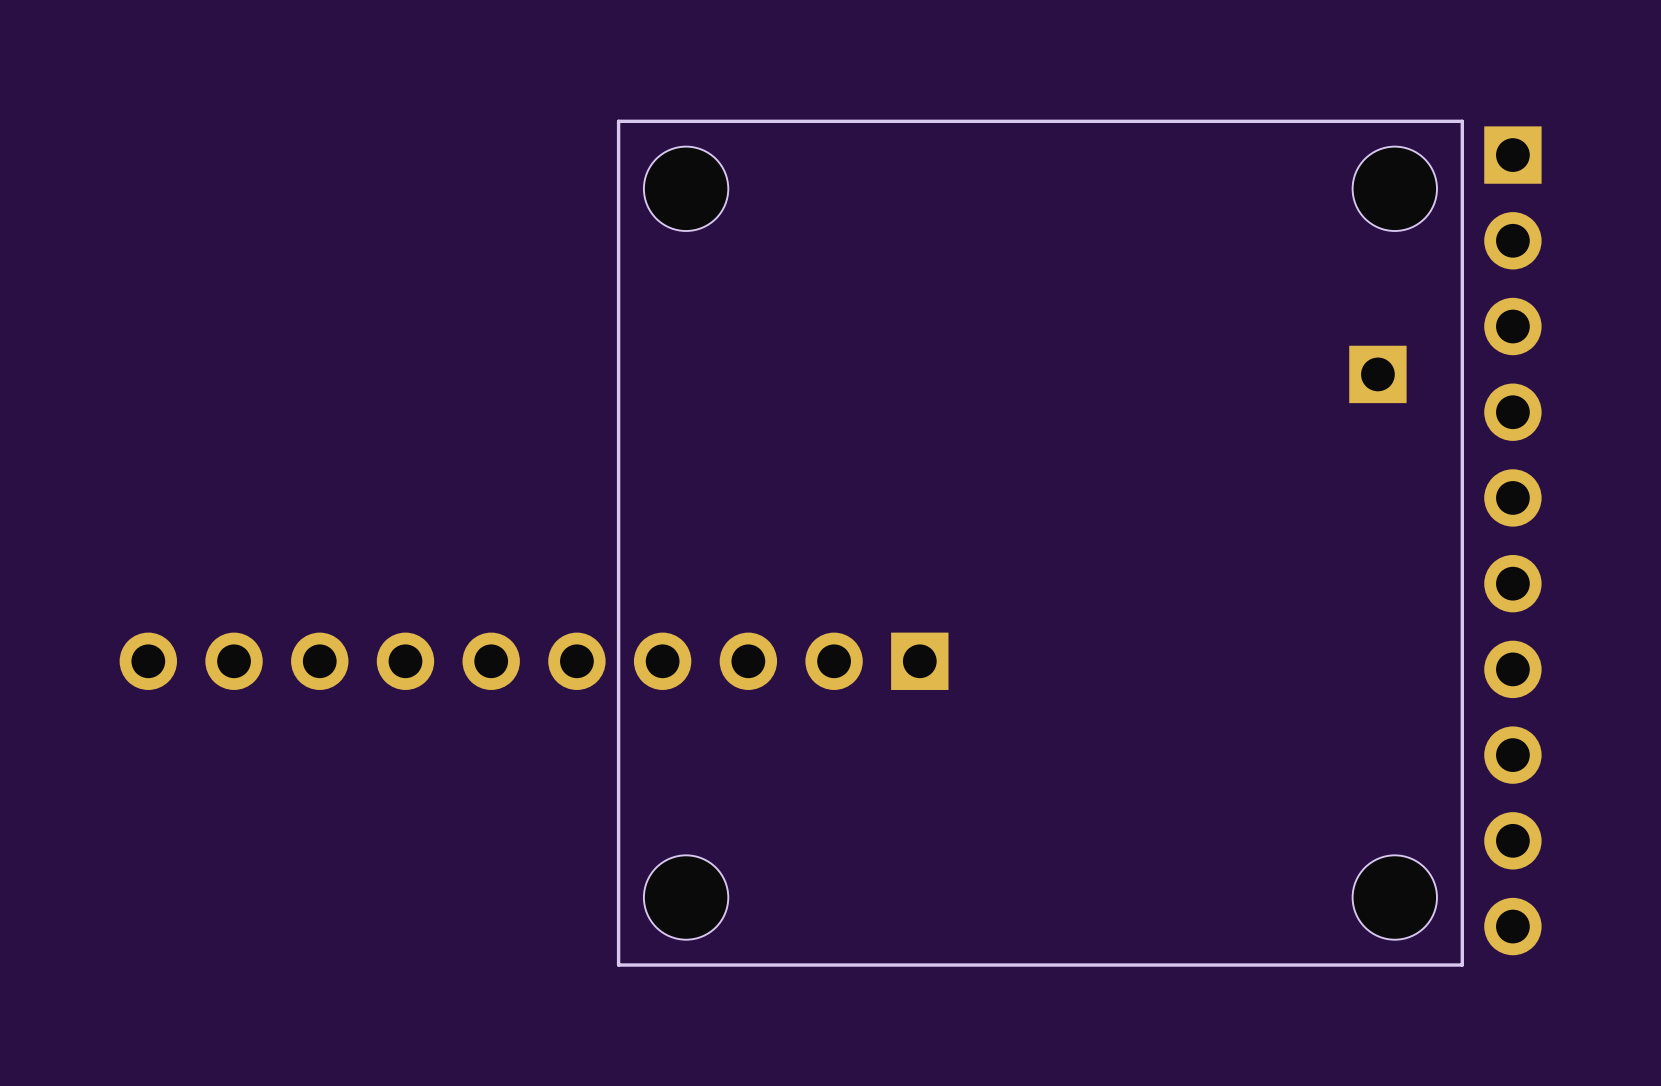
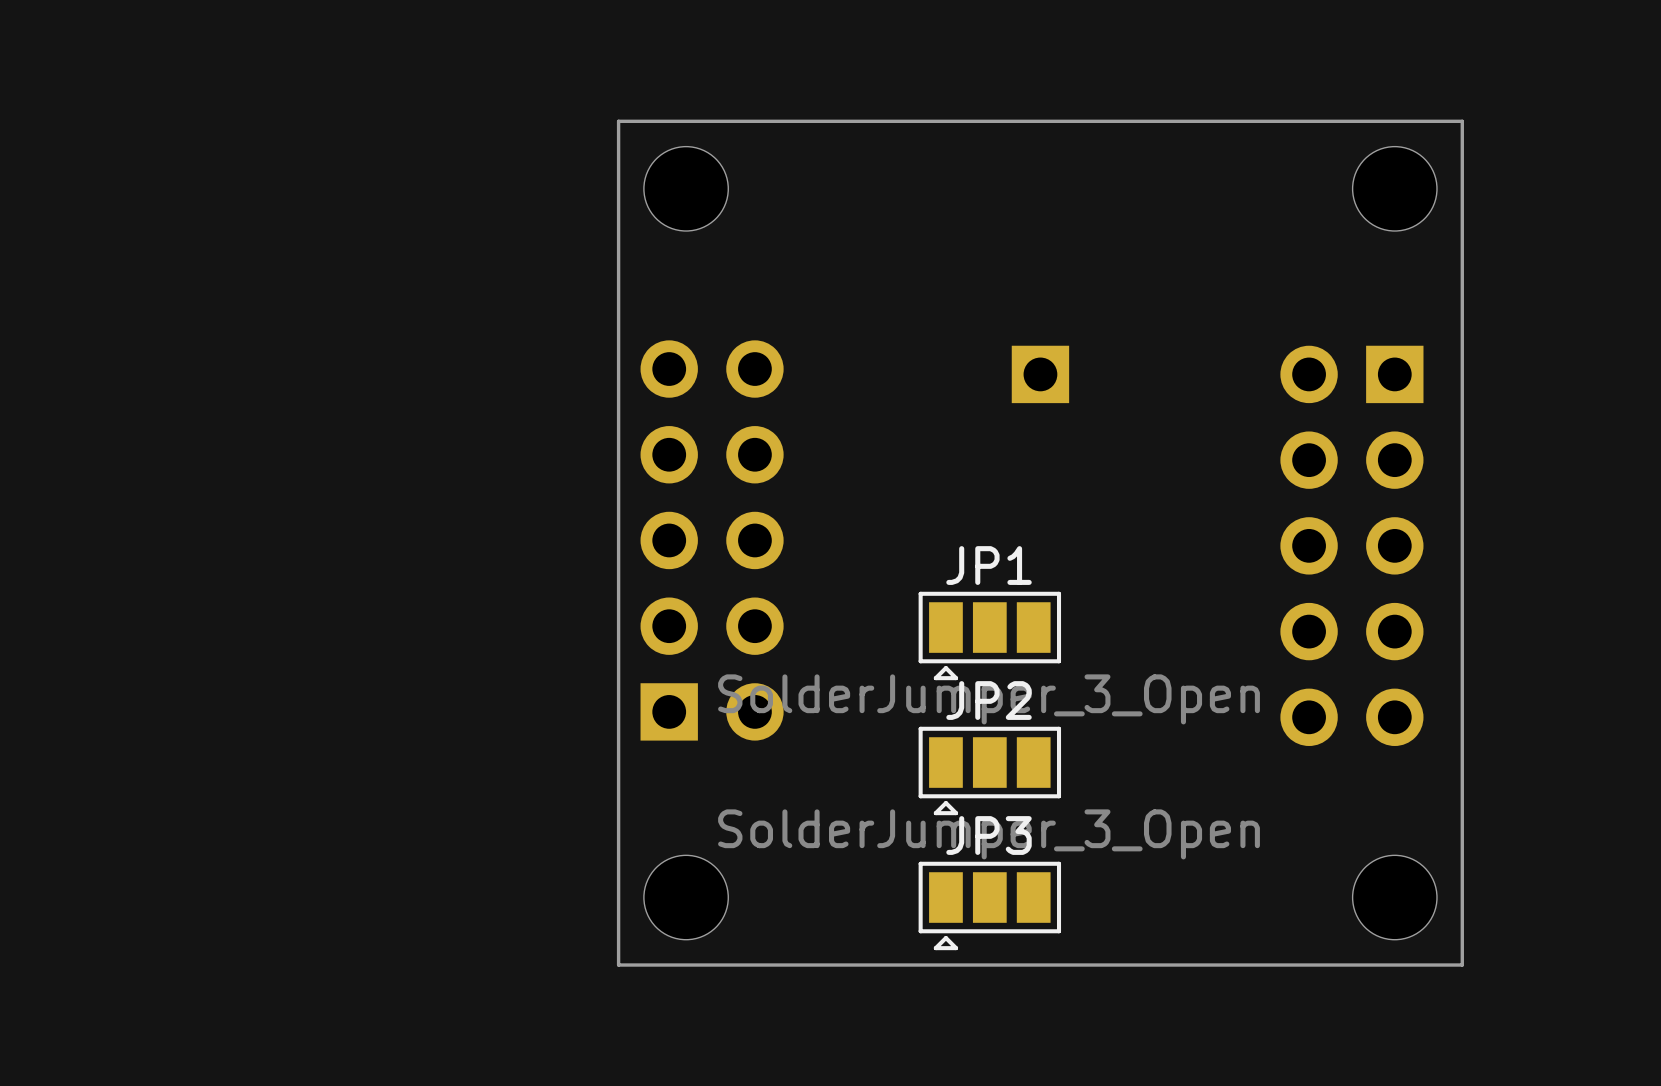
part position: (1377, 374) -> (1040, 374)
part: none -> (712, 540)
part: (1512, 540) -> none
part: none -> (1351, 545)
JP1: none -> SolderJumper_3_Open (989, 635)
part: (534, 661) -> none
JP2: none -> SolderJumper_3_Open (989, 770)
JP3: none -> (989, 905)

